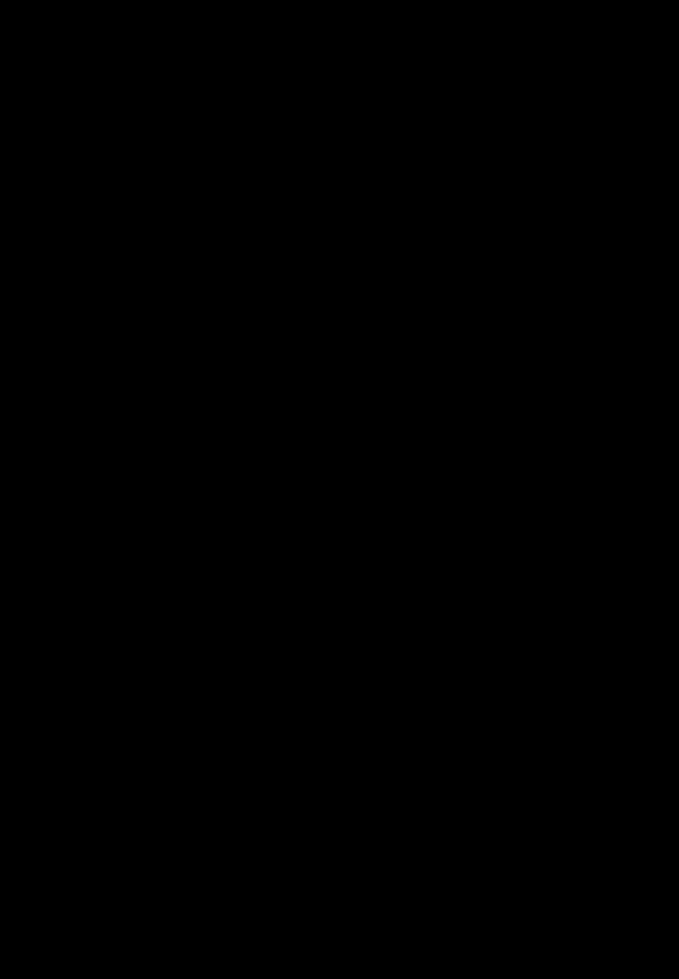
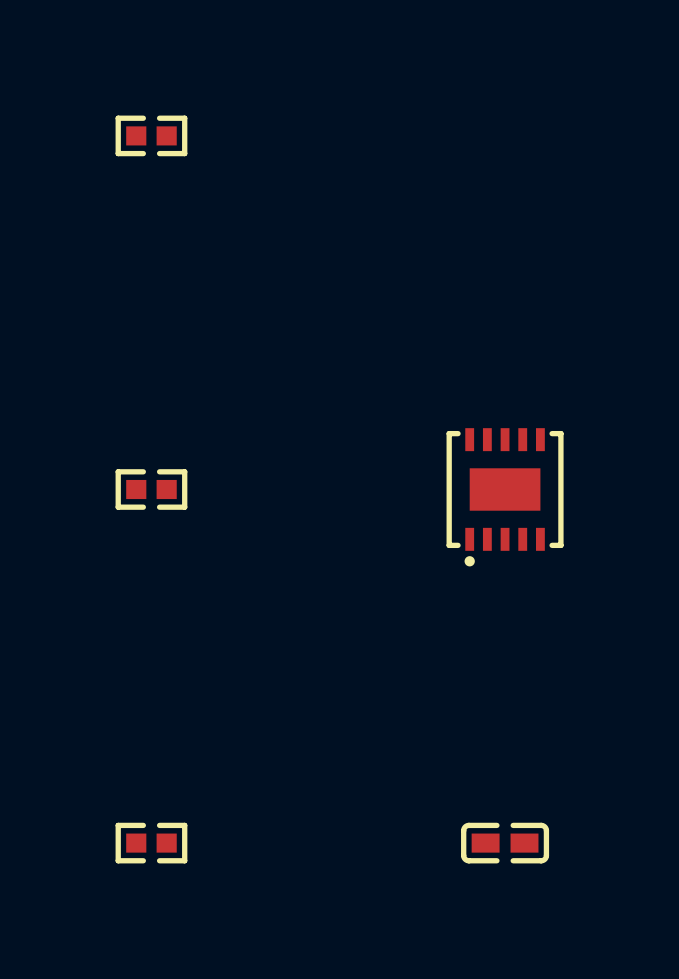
part: none -> (151, 135)
part: none -> (151, 489)
part: none -> (505, 497)
part: none -> (151, 843)
part: none -> (505, 843)

